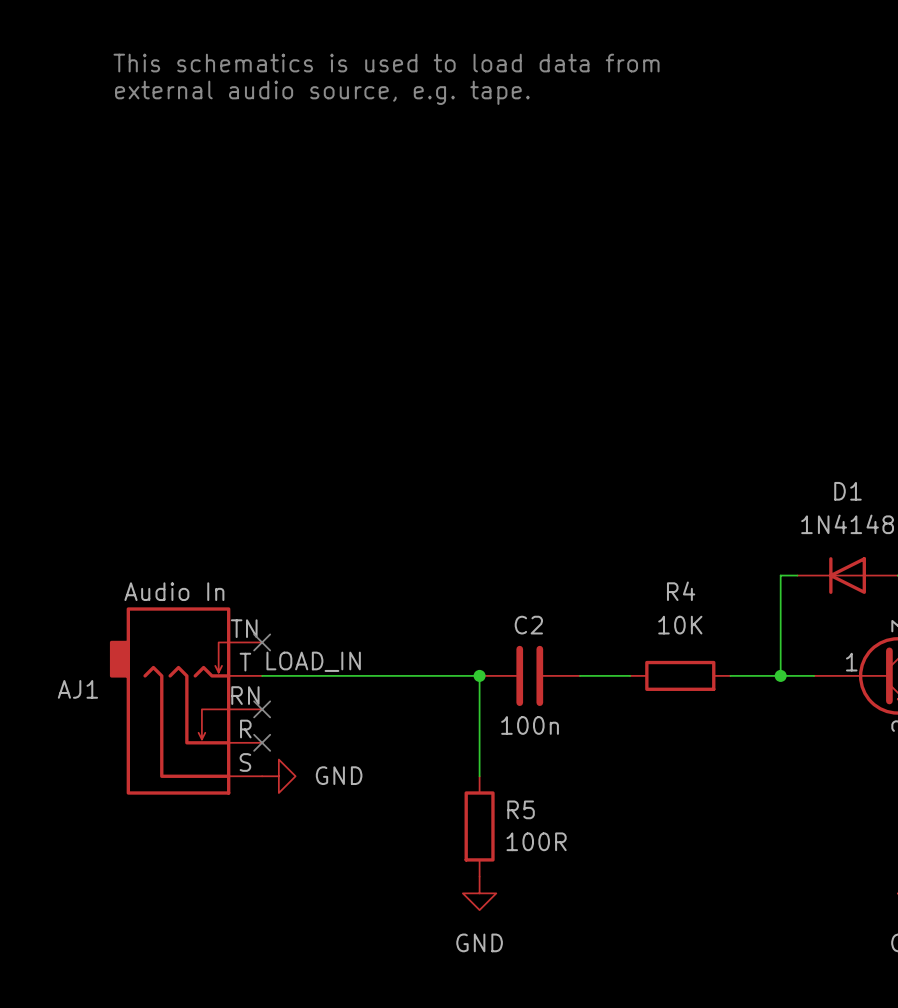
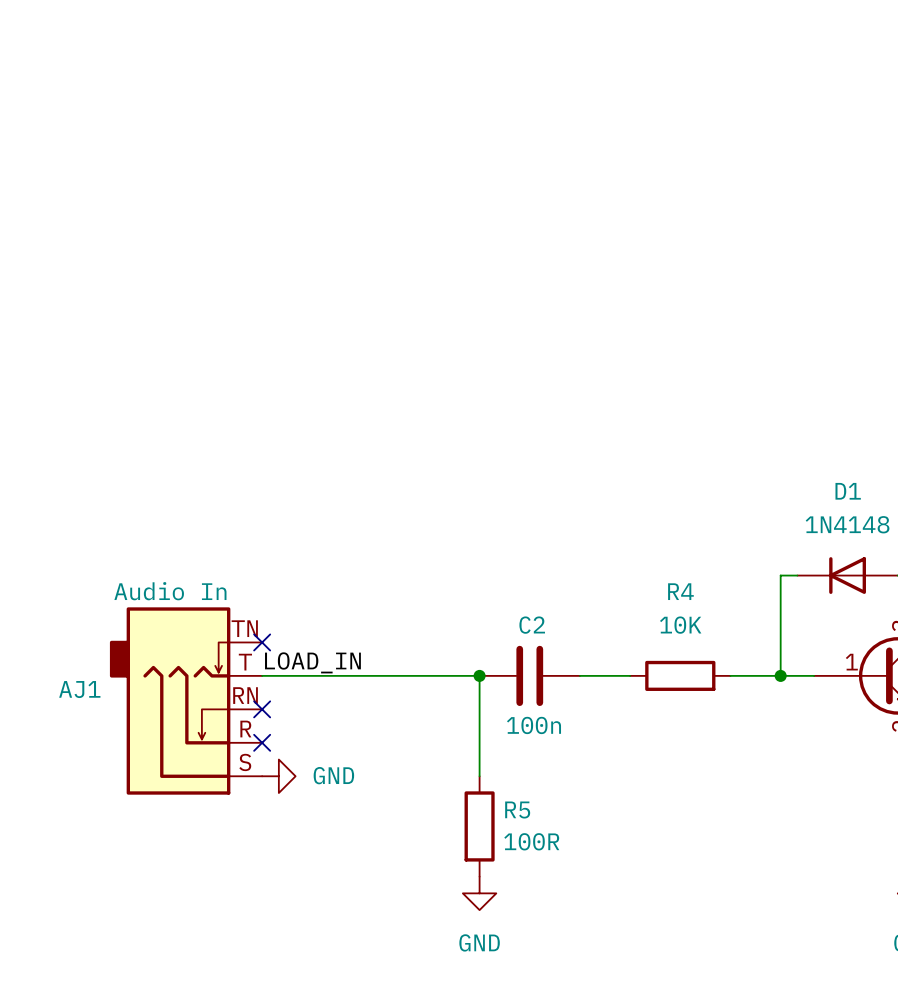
text: This schematics is used to load data from (386, 63) -> none
text: external audio source, e.g. tape. (322, 92) -> none

